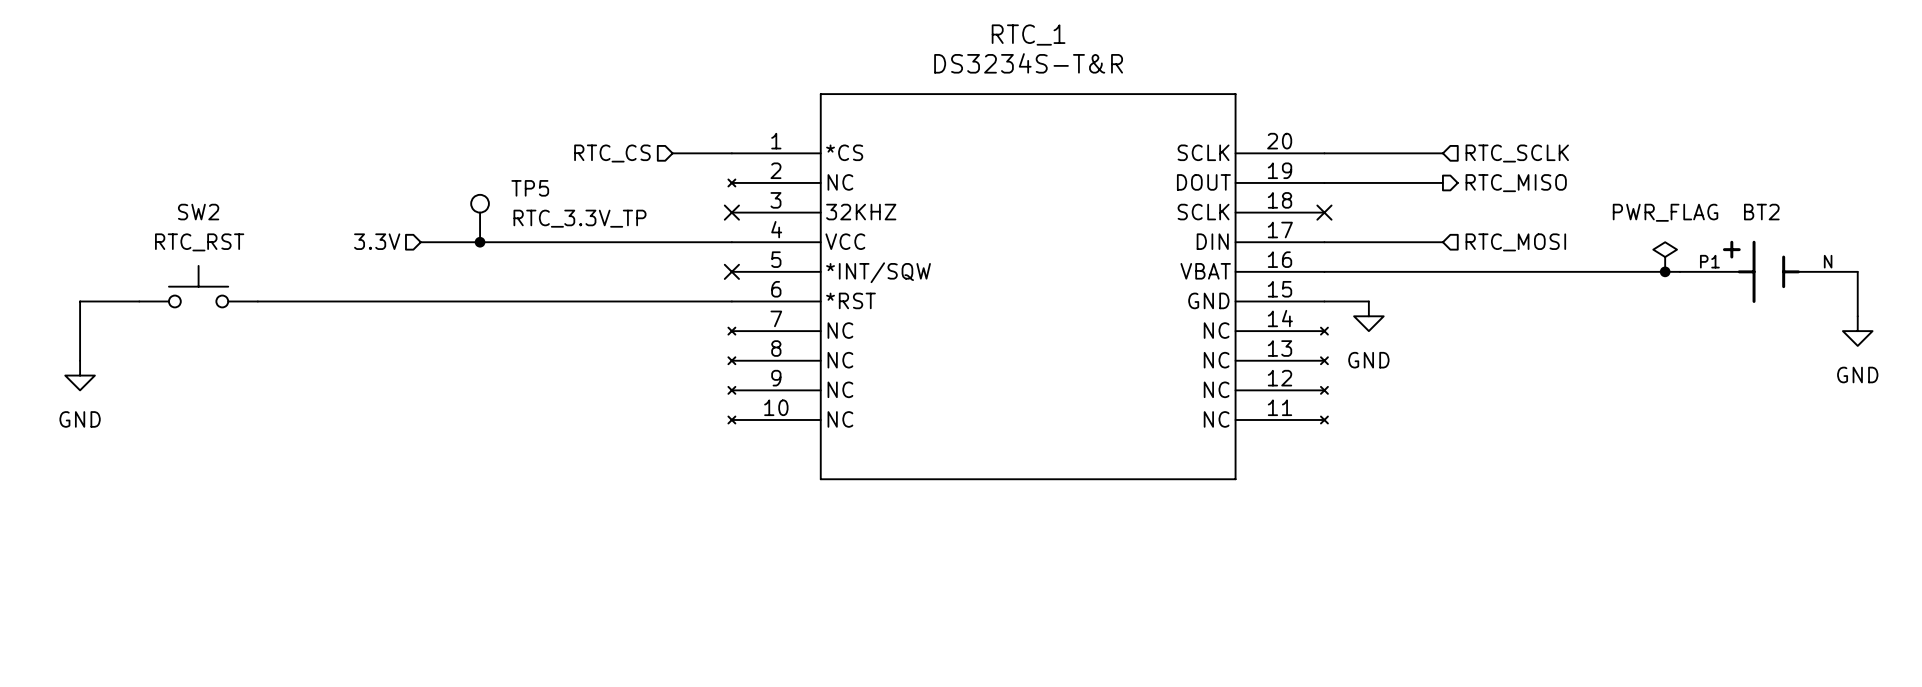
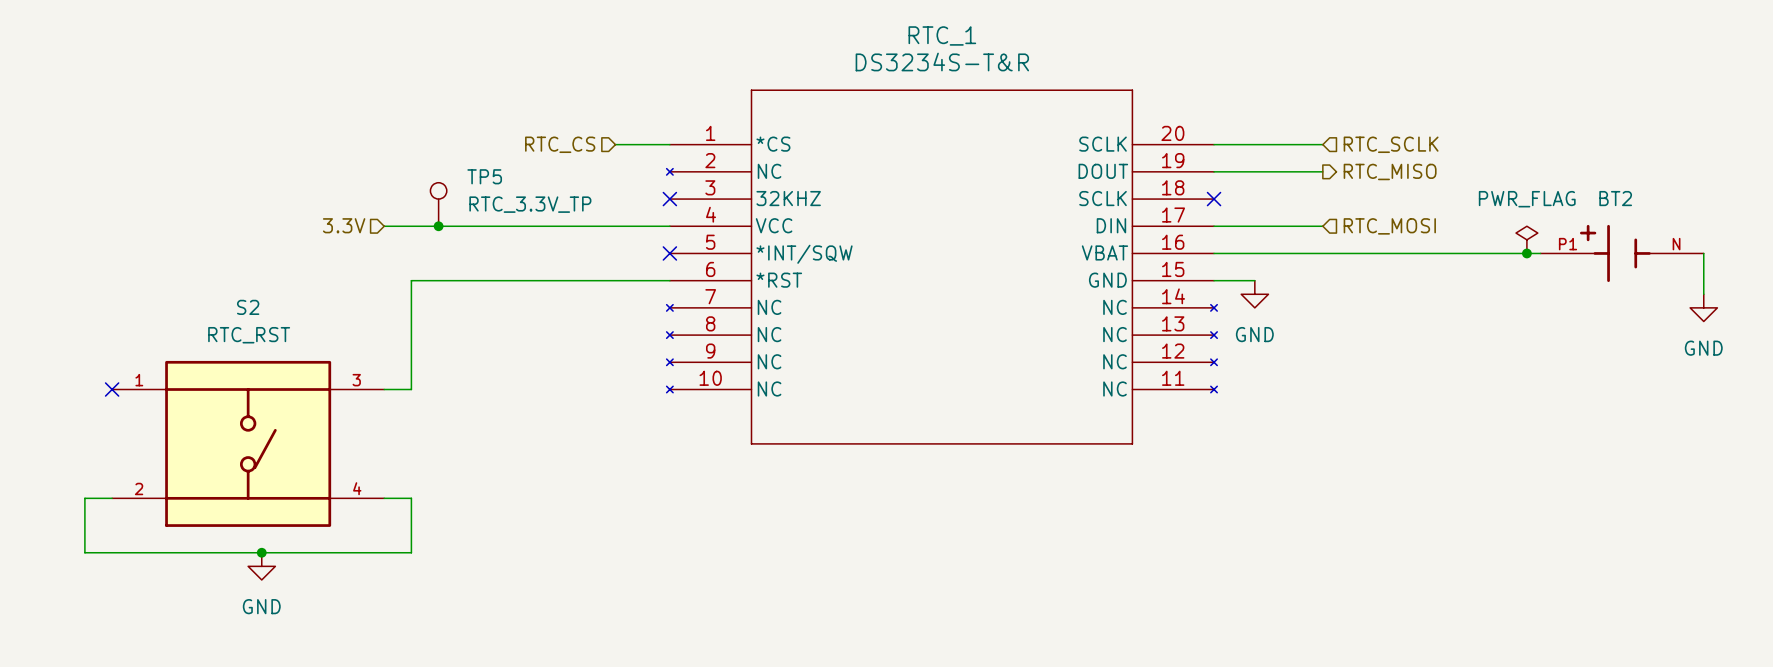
SW2: RTC_RST (198, 286) -> none
wire: (139, 301) (80, 301) (80, 360) -> none
wire: (257, 301) (450, 301) -> (384, 389) (411, 389) (411, 280)
power symbol: GND (80, 375) -> none
no-connect mark: none -> (112, 389)
S2: none -> RTC_RST (248, 443)
wire: none -> (112, 498) (84, 498) (84, 552) (411, 552) (411, 498) (384, 498)
junction: none -> (261, 552)
power symbol: none -> GND (261, 566)

